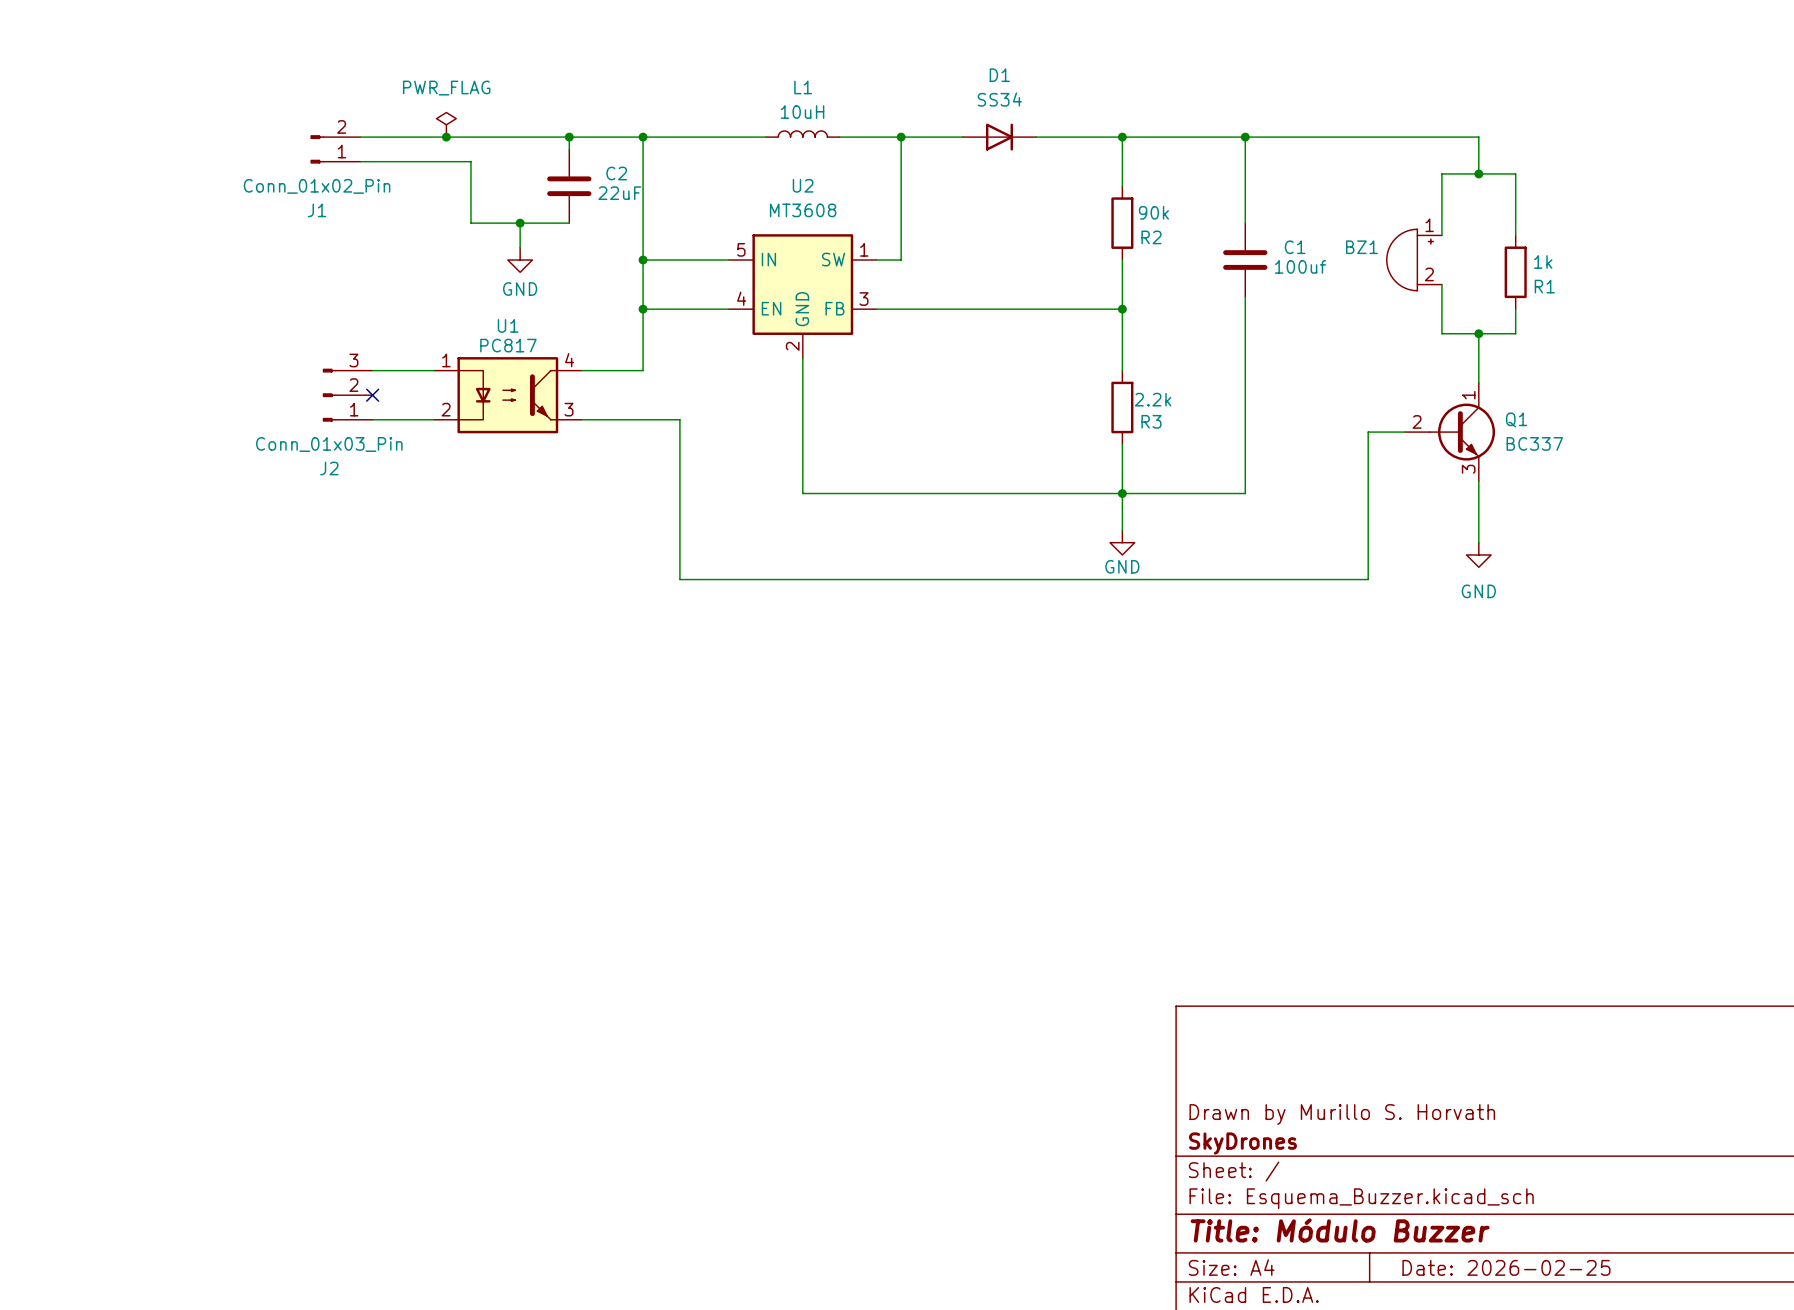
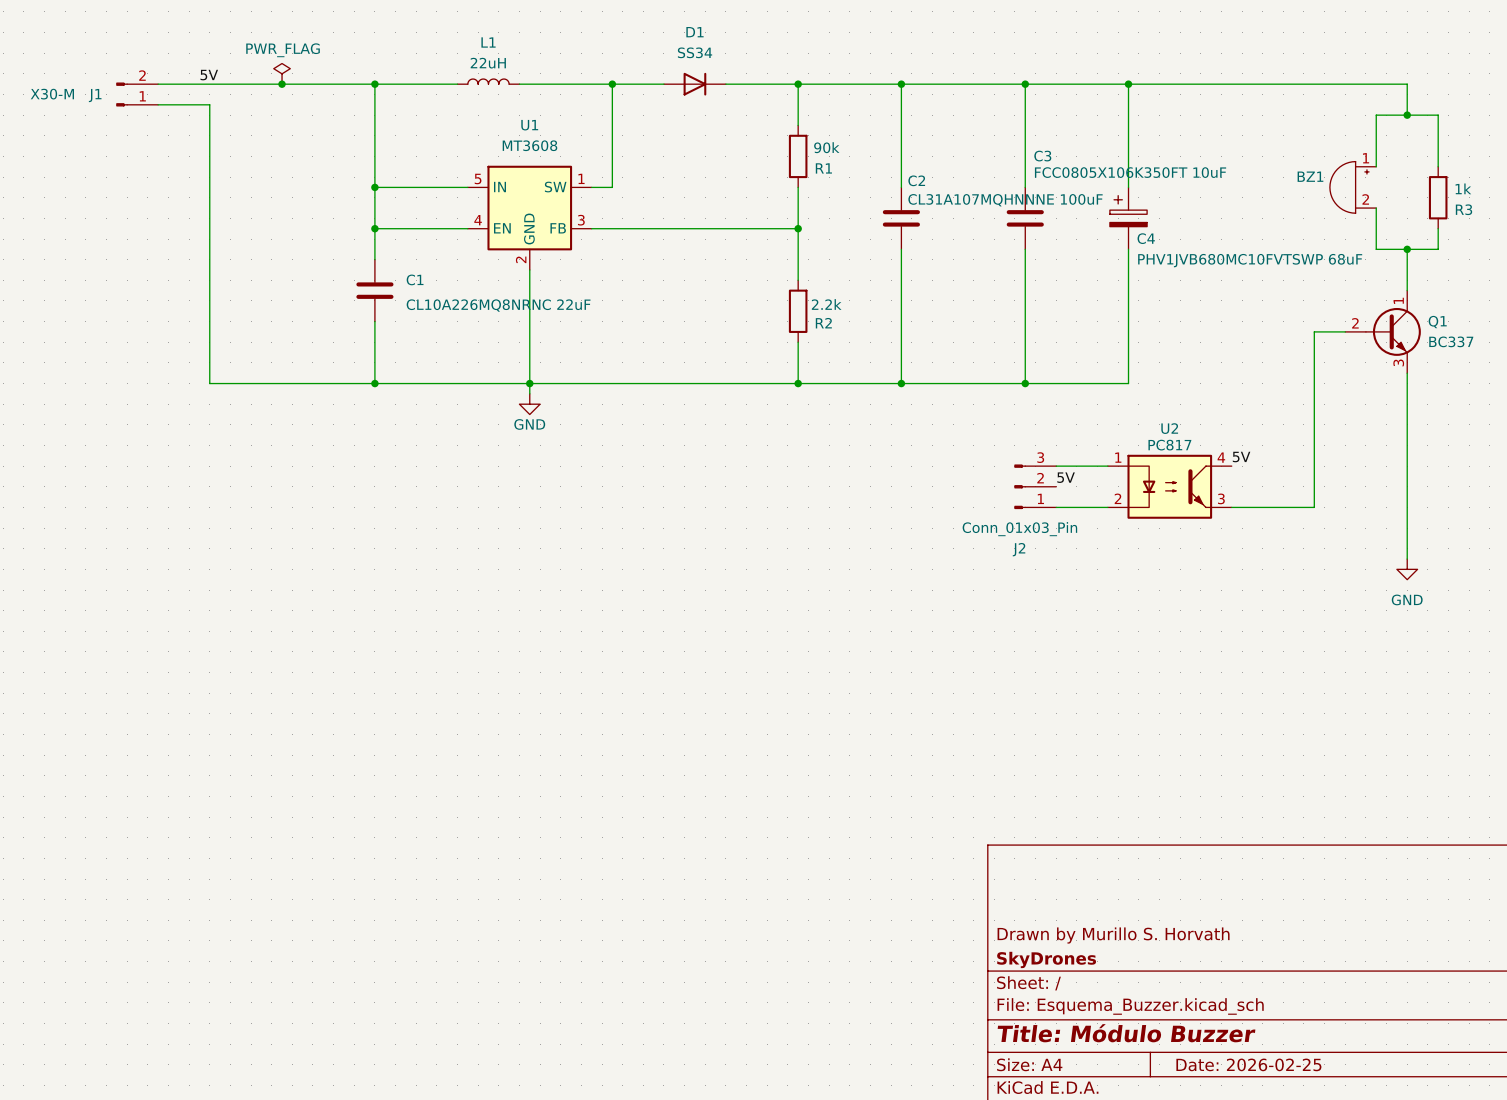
power symbol text position: PWR_FLAG (446, 88) -> PWR_FLAG (283, 50)
label: none -> 5V (209, 75)
wire: none -> (158, 84) (457, 84)
junction: none -> (282, 84)
wire: none -> (374, 84) (374, 259)
wire: none -> (519, 84) (663, 84)
junction: none -> (612, 84)
wire: none -> (725, 84) (1407, 84) (1407, 115)
junction: none -> (798, 84)
wire: none -> (901, 84) (901, 187)
junction: none -> (901, 84)
wire: none -> (1025, 84) (1025, 187)
wire: none -> (1128, 84) (1128, 187)
junction: none -> (1128, 84)
L1 value: 10uH (802, 112) -> 22uH (488, 63)
wire: none -> (158, 104) (209, 104) (209, 383) (1128, 383) (1128, 249)
power symbol position: PWR_FLAG (446, 124) -> PWR_FLAG (282, 73)
L1 position: (802, 134) -> (488, 81)
wire: (360, 137) (765, 137) -> none
junction position: (446, 137) -> (374, 84)
wire: (569, 137) (569, 149) -> none
junction: (569, 137) -> none
wire: (643, 137) (643, 370) (581, 370) -> none
junction: (643, 137) -> none
wire: (839, 137) (962, 137) -> none
wire: (901, 137) (901, 260) (876, 260) -> (612, 84) (612, 187) (591, 187)
junction: (901, 137) -> none
D1 position: (999, 137) -> (694, 84)
wire: (1036, 137) (1478, 137) (1478, 173) -> none
wire: (1122, 137) (1122, 186) -> (798, 84) (798, 125)
junction: (1122, 137) -> none
wire: (1245, 137) (1245, 223) -> none
junction position: (1245, 137) -> (1025, 84)
junction: none -> (1407, 115)
J1 position: (335, 149) -> (137, 94)
wire: (360, 161) (470, 161) (470, 223) -> (374, 187) (395, 187)
C2 name position: C2 (616, 173) -> C2 (916, 180)
junction: (1478, 173) -> none
U2 name position: U2 (803, 185) -> U2 (1169, 428)
J1 value: Conn_01x02_Pin (317, 186) -> X30-M (52, 94)
C2 position: (569, 186) -> (901, 218)
C2 value: 22uF (619, 193) -> CL31A107MQHNNNE 100uF (1005, 200)
J1 name position: J1 (317, 210) -> J1 (95, 95)
U2 value: MT3608 (803, 210) -> PC817 (1169, 445)
R2 value: 90k (1153, 212) -> 2.2k (826, 304)
junction: none -> (374, 187)
wire: (520, 223) (520, 247) -> none
junction: (520, 223) -> none
R2 position: (1122, 223) -> (798, 311)
U2 symbol: [729, 234, 877, 359] -> [1107, 454, 1232, 519]
wire: (1441, 235) (1441, 173) (1515, 173) (1515, 235) -> (1376, 166) (1376, 115) (1438, 115) (1438, 166)
power symbol: GND (520, 260) -> none
wire: (643, 260) (729, 260) -> none
junction: (643, 260) -> none
wire: (1122, 260) (1122, 370) -> (798, 187) (798, 280)
C3: none -> FCC0805X106K350FT 10uF (1025, 218)
C1 position: (1245, 260) -> (374, 290)
C4: none -> PHV1JVB680MC10FVTSWP 68uF (1128, 218)
BZ1 position: (1414, 260) -> (1353, 187)
R1 value: 1k (1543, 262) -> 90k (826, 147)
C1 value: 100uf (1300, 266) -> CL10A226MQ8NRNC 22uF (498, 305)
wire: none -> (374, 228) (467, 228)
junction: none -> (374, 228)
junction: none -> (798, 228)
R1 position: (1515, 272) -> (798, 156)
wire: (1441, 284) (1441, 333) (1515, 333) (1515, 309) -> (1376, 208) (1376, 249) (1438, 249) (1438, 228)
wire: none -> (901, 249) (901, 383)
wire: none -> (1025, 249) (1025, 383)
wire: (1245, 296) (1245, 493) (802, 493) (802, 358) -> none
junction: none -> (1407, 249)
wire: (643, 309) (729, 309) -> none
junction: (643, 309) -> none
wire: (876, 309) (1122, 309) -> (591, 228) (798, 228)
junction: (1122, 309) -> none
wire: none -> (529, 269) (529, 393)
U1 name position: U1 (508, 325) -> U1 (529, 125)
wire: (1478, 333) (1478, 382) -> (1407, 249) (1407, 290)
junction: (1478, 333) -> none
U1 value: PC817 (508, 345) -> MT3608 (529, 145)
U1 symbol: [434, 357, 582, 434] -> [467, 165, 592, 270]
wire: (372, 370) (434, 370) -> none
wire: none -> (374, 321) (374, 383)
J2 position: (347, 395) -> (1035, 486)
no-connect mark: (372, 395) -> none
wire: none -> (1345, 331) (1314, 331) (1314, 507) (1231, 507)
R3 value: 2.2k (1153, 399) -> 1k (1463, 188)
wire: none -> (798, 342) (798, 383)
R3 position: (1122, 407) -> (1438, 197)
wire: (372, 419) (434, 419) -> none
wire: (581, 419) (679, 419) (679, 579) (1368, 579) (1368, 432) (1405, 432) -> none
Q1 position: (1450, 432) -> (1383, 331)
wire: (1122, 444) (1122, 530) -> none
wire: none -> (1407, 373) (1407, 559)
junction: none -> (374, 383)
junction: none -> (529, 383)
junction: none -> (798, 383)
junction: none -> (901, 383)
junction: none -> (1025, 383)
power symbol: none -> GND (529, 404)
wire: (1478, 481) (1478, 542) -> none
junction: (1122, 493) -> none
power symbol: GND (1122, 542) -> none
label: none -> 5V (1241, 457)
wire: none -> (1056, 466) (1107, 466)
power symbol position: GND (1478, 554) -> GND (1407, 569)
label: none -> 5V (1066, 477)
wire: none -> (1056, 507) (1107, 507)

